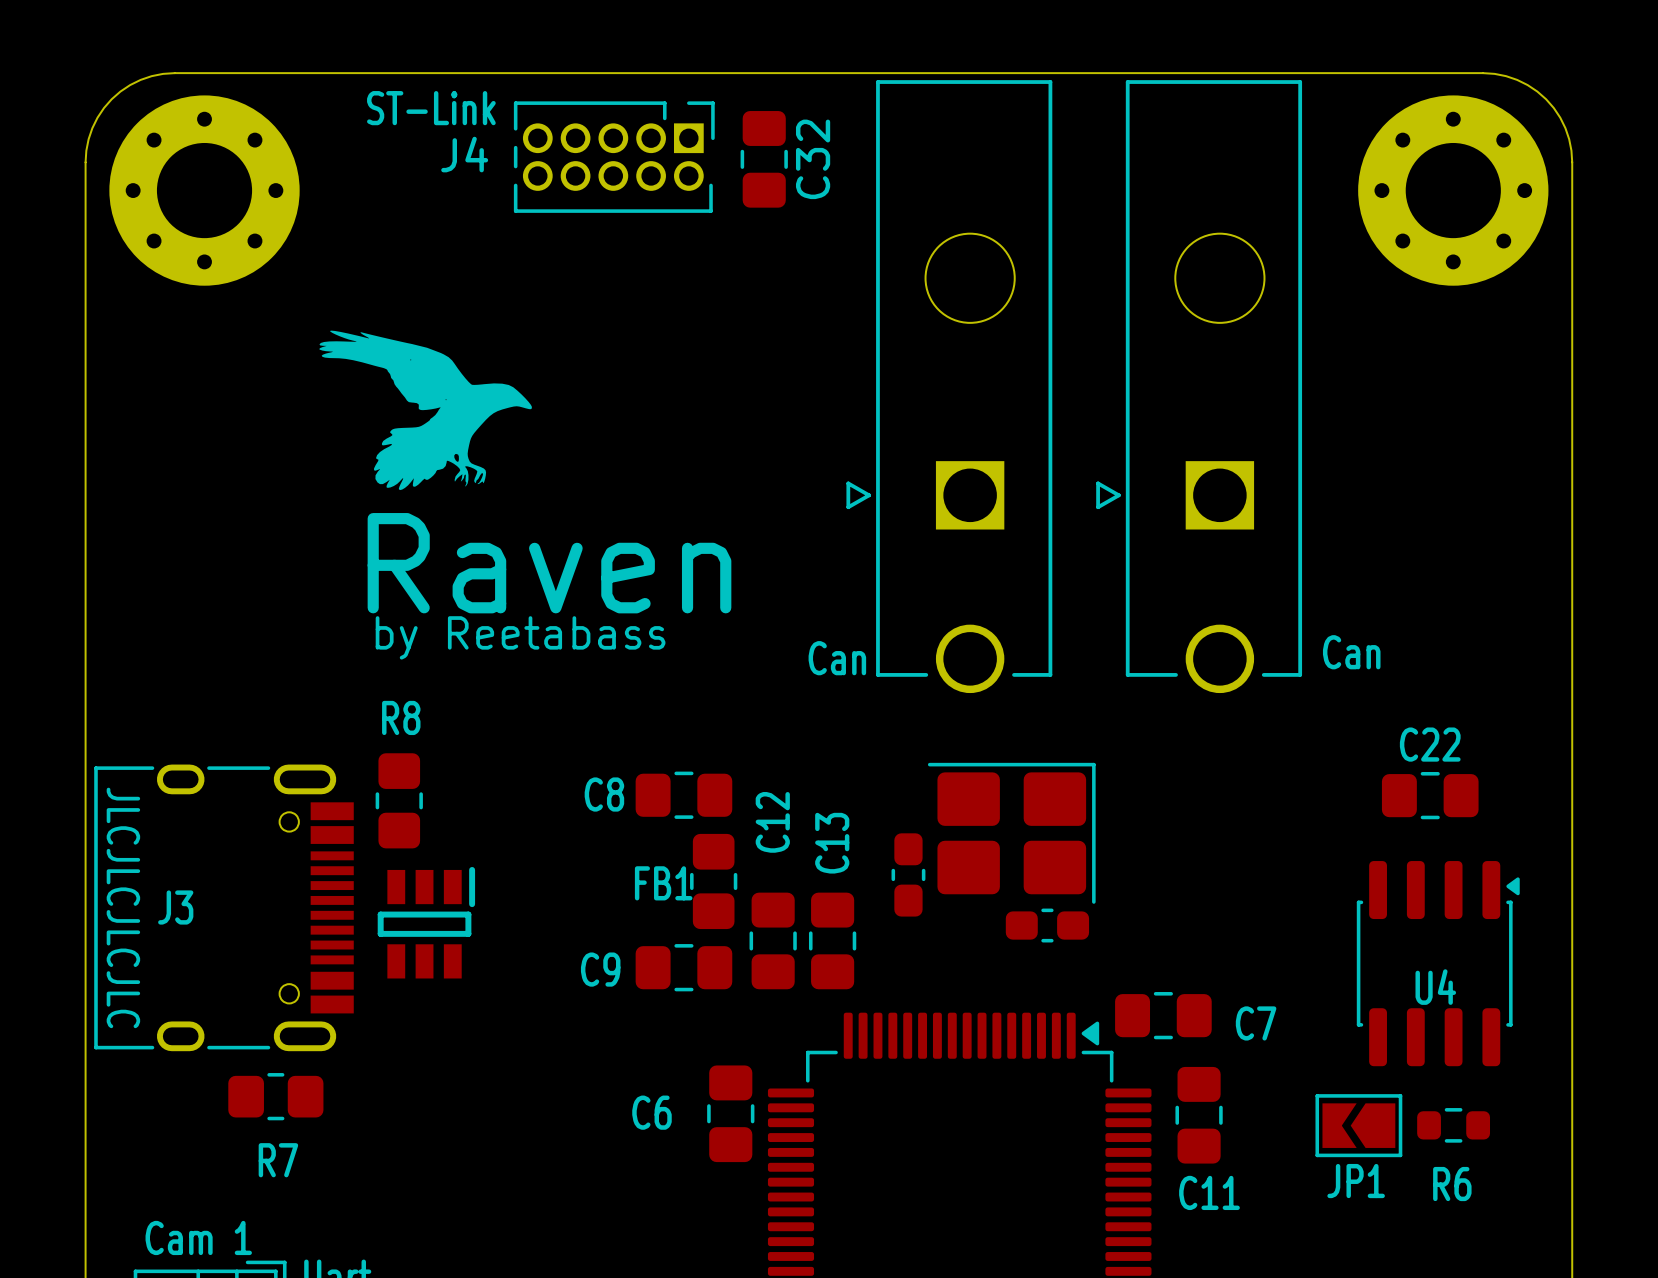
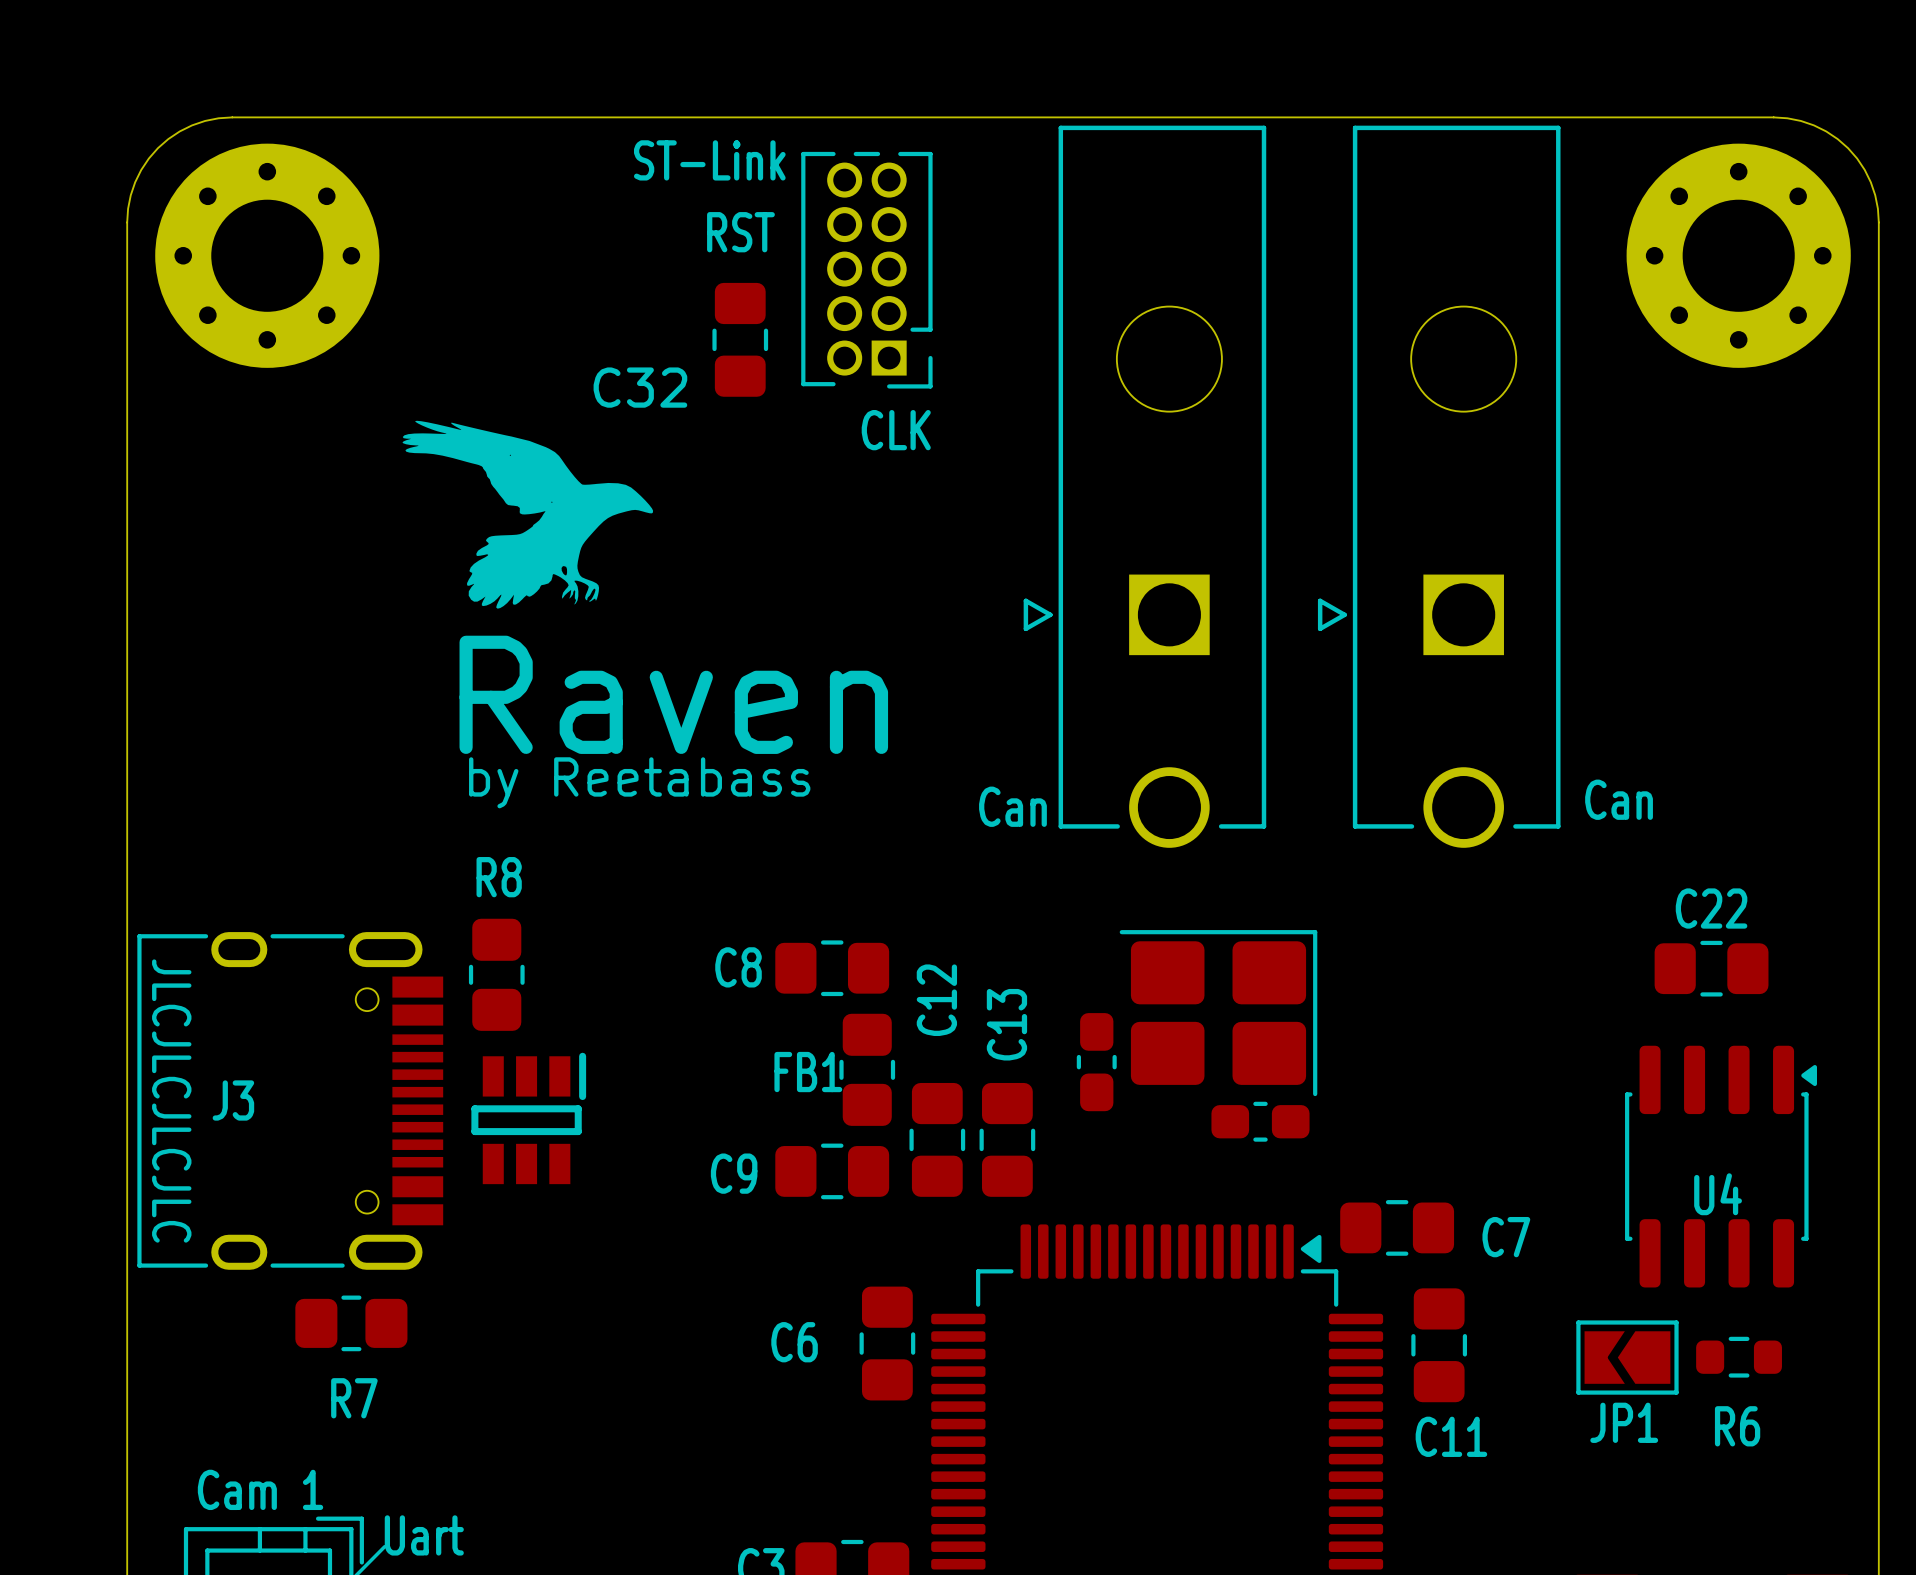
text position: ST-Link (431, 108) -> ST-Link (709, 160)
J4: (614, 157) -> none
C32 position: (764, 159) -> (740, 339)
C32 name rotation: 0° (813, 159) -> 90° clockwise (640, 387)
C32 name position: C32 (813, 159) -> C32 (640, 387)
text: none -> RST (740, 232)
part: none -> (866, 270)
text: none -> CLK (896, 430)

